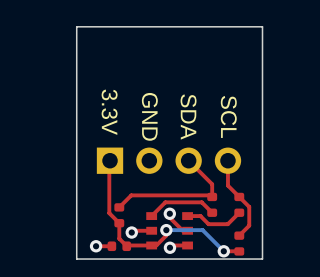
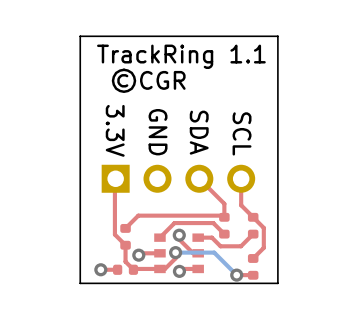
text: none -> TrackRing 1.1 (181, 56)
text: none -> ©CGR (148, 80)

